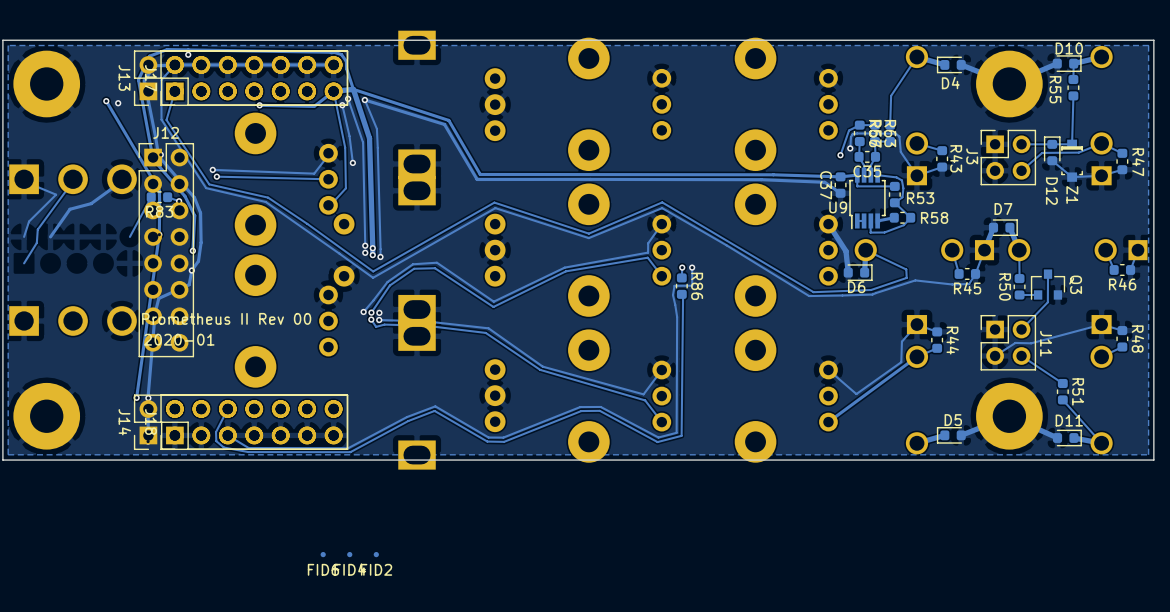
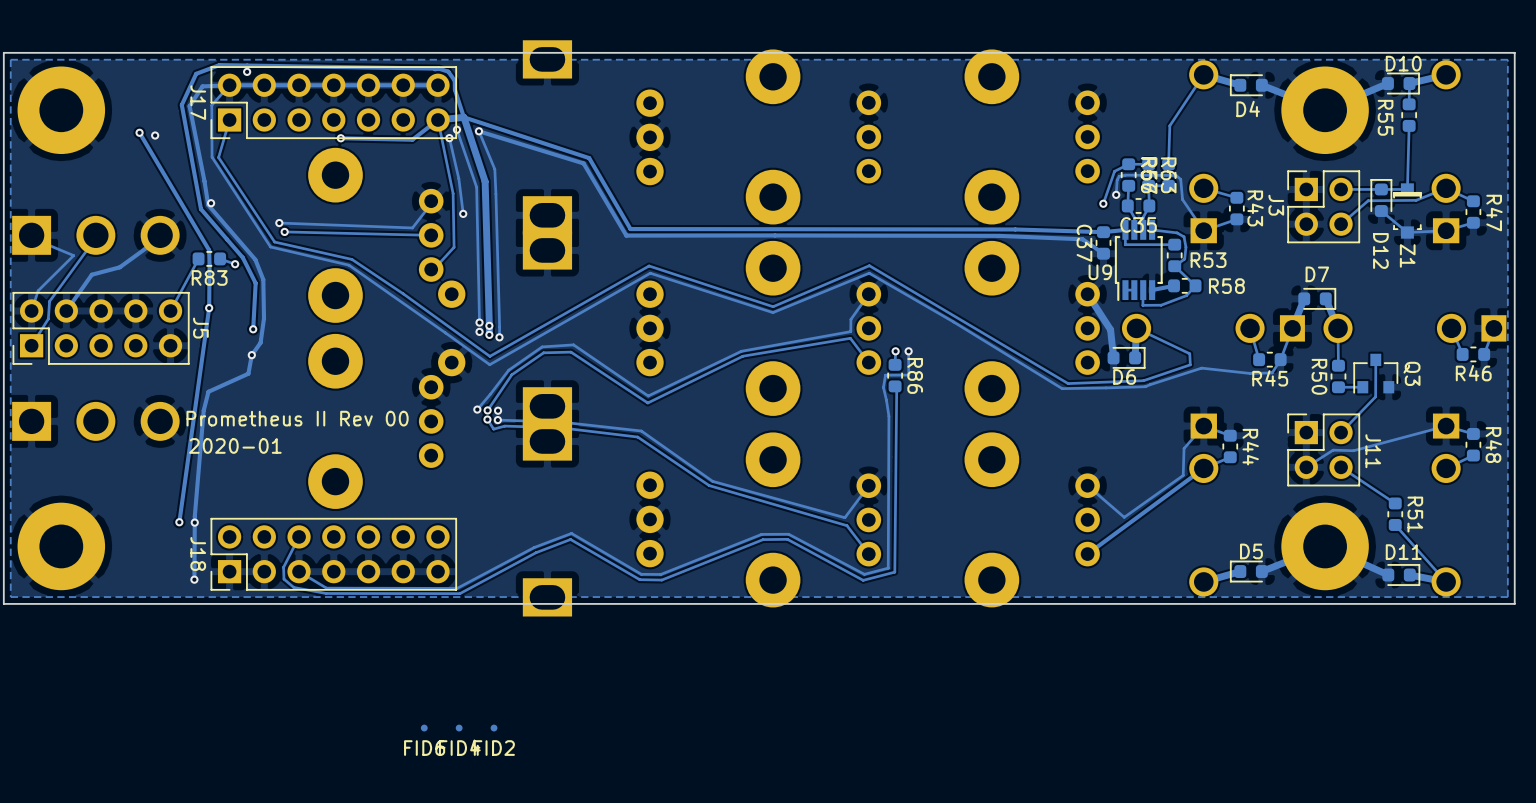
J13: (241, 78) -> none
J5: none -> (101, 328)
J12: (166, 250) -> none
J14: (241, 422) -> none

